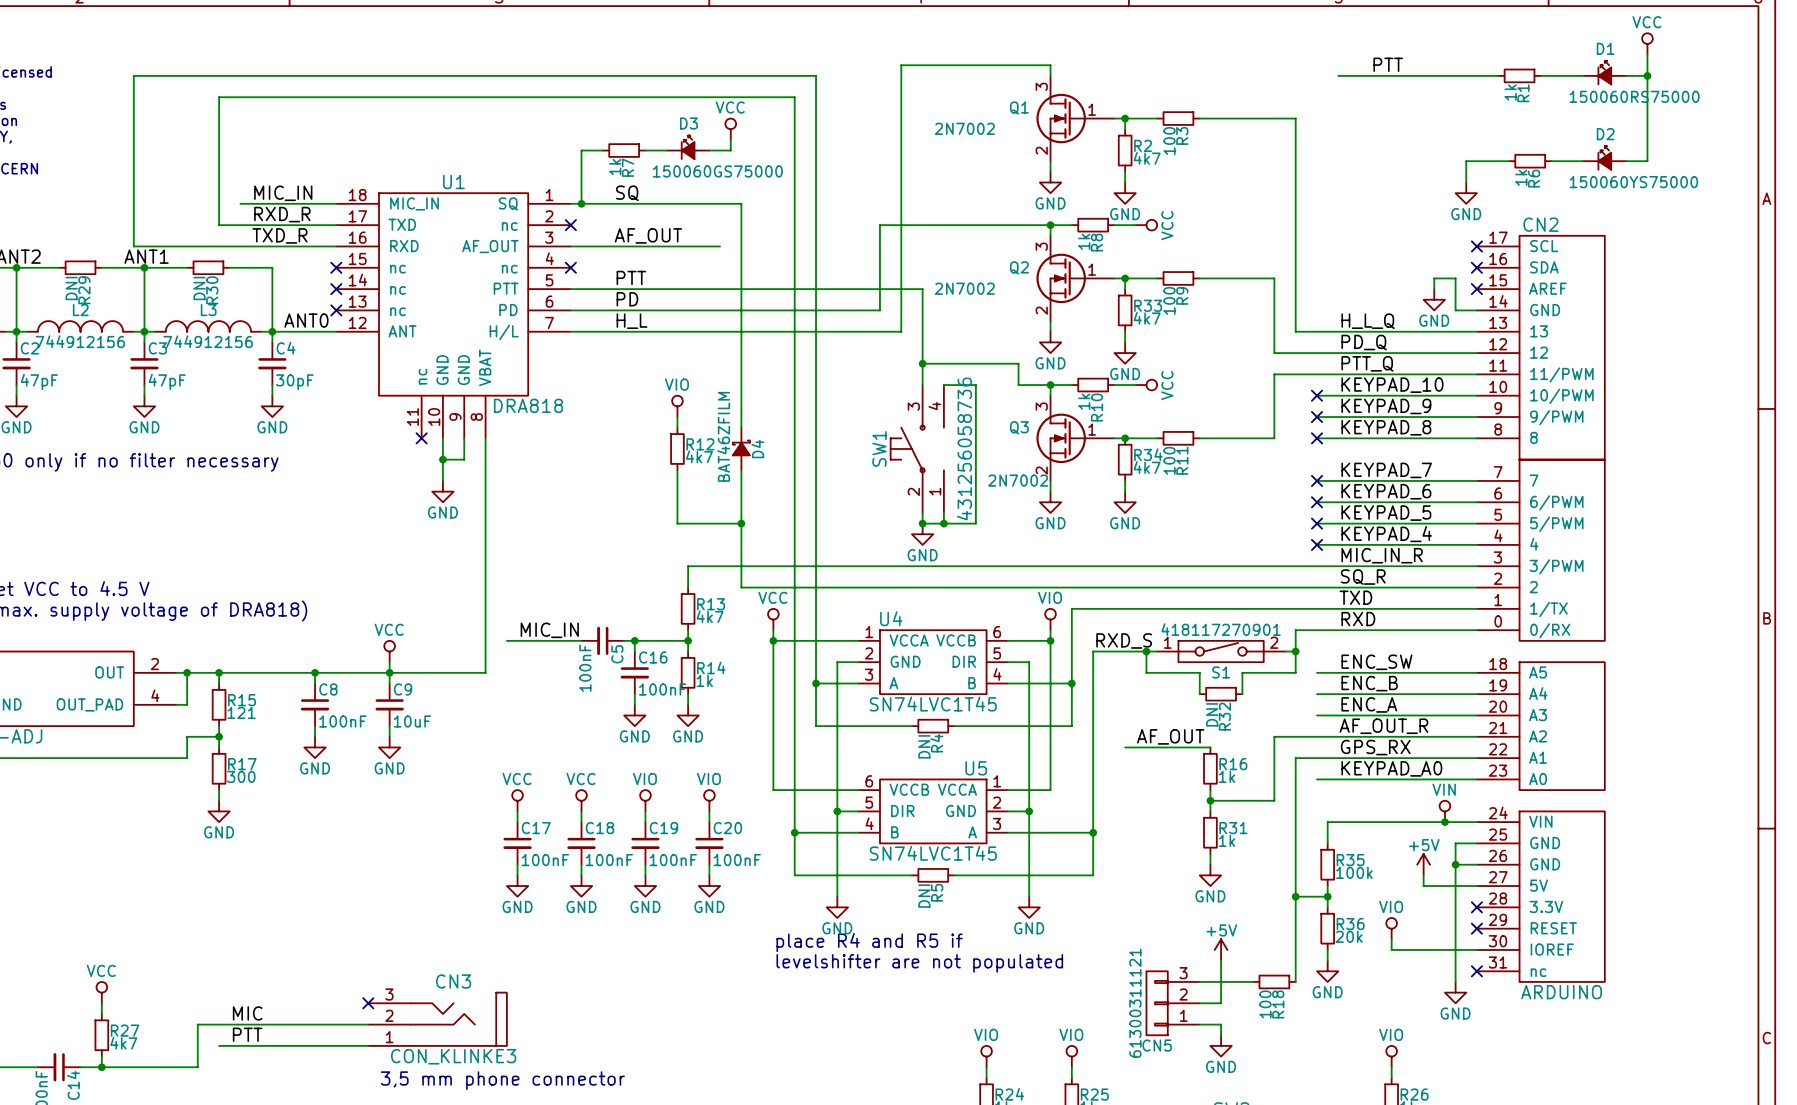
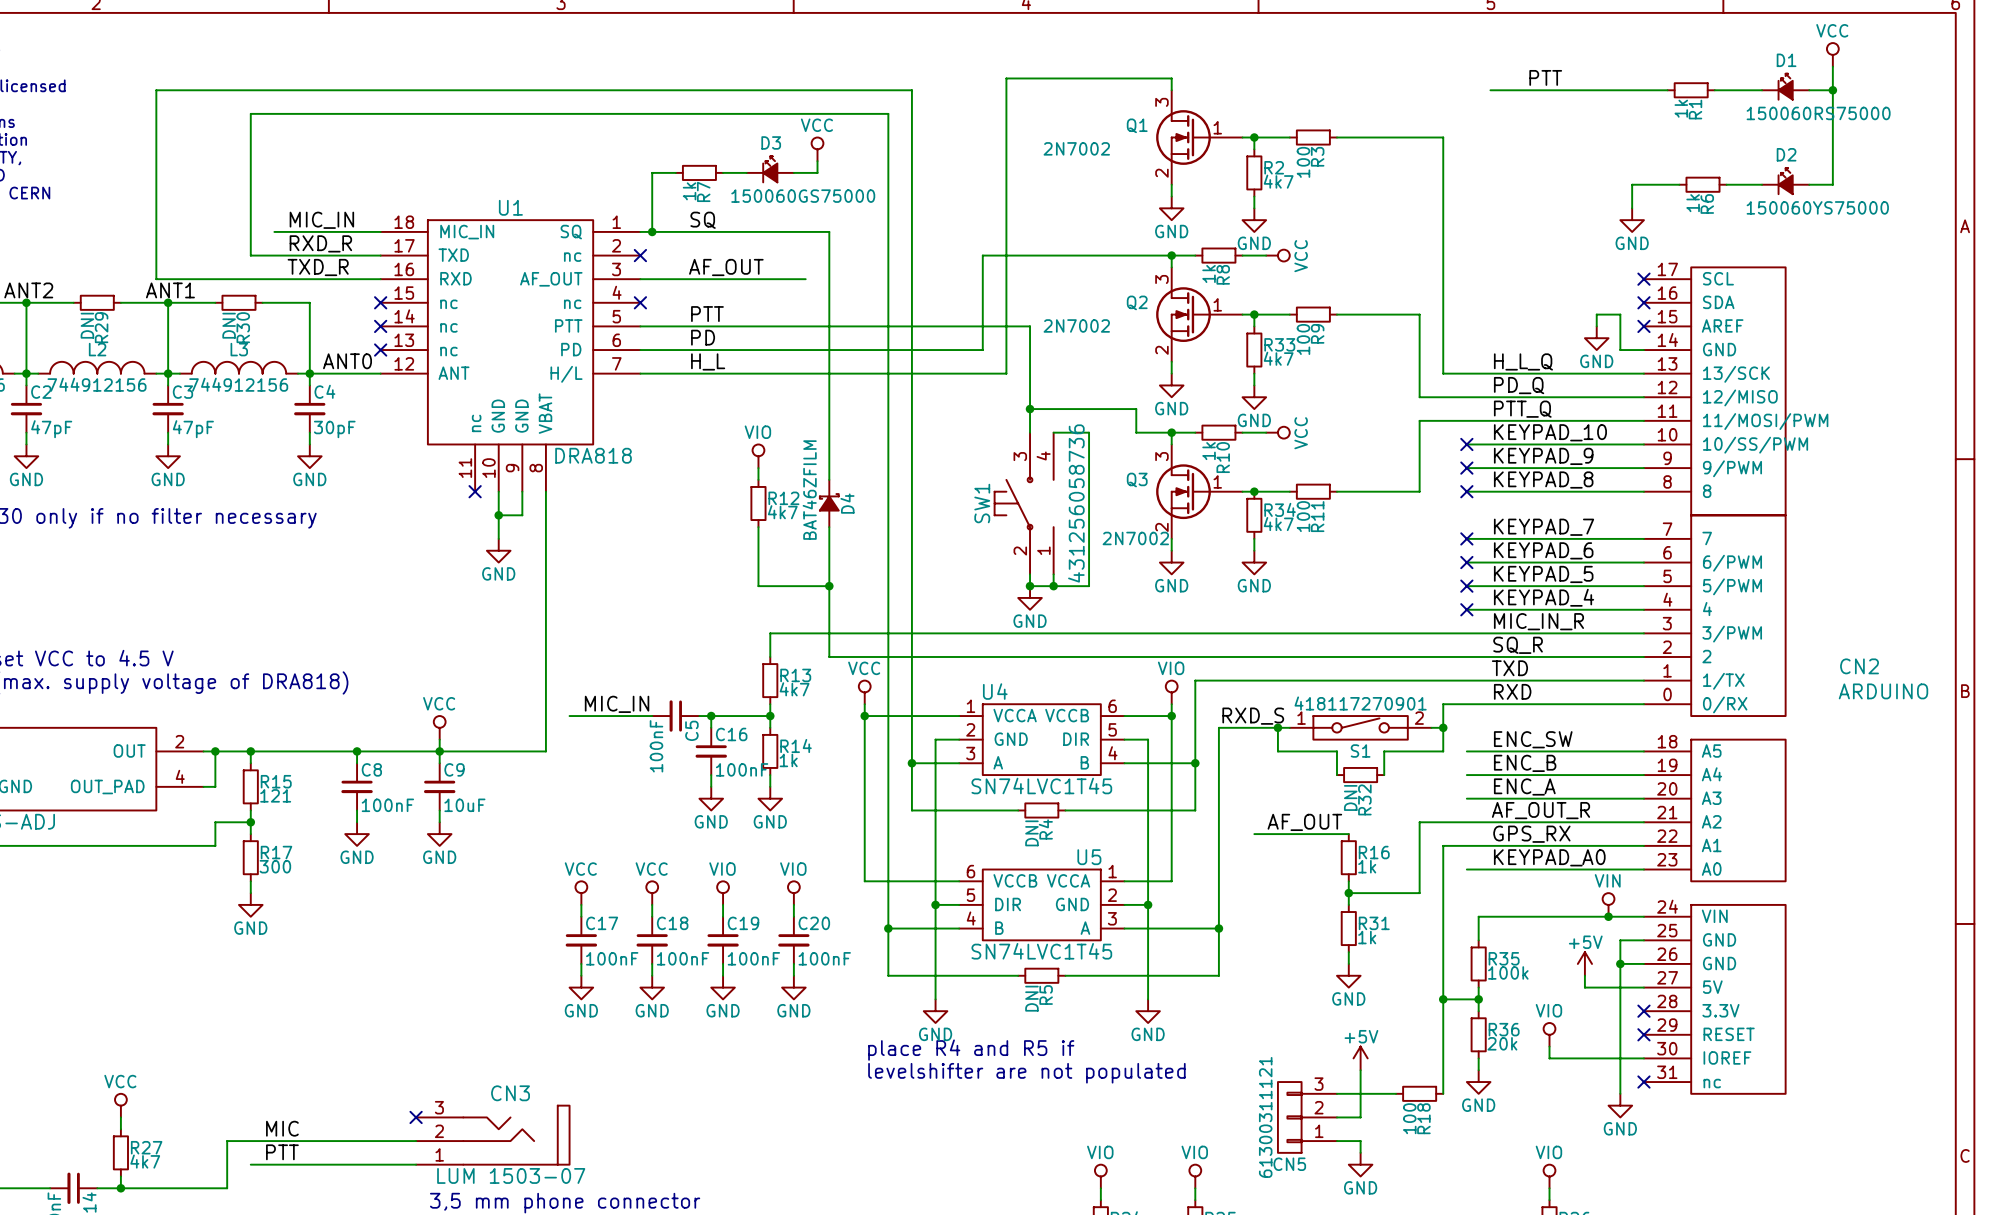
CN2 name position: CN2 (1540, 224) -> CN2 (1859, 666)
CN2 pin name: 13 (1539, 331) -> 13/SCK (1736, 374)
CN2 pin name: 12 (1539, 352) -> 12/MISO (1740, 397)
CN2 pin name: 11/PWM (1561, 375) -> 11/MOSI/PWM (1765, 421)
CN2 pin name: 10/PWM (1561, 396) -> 10/SS/PWM (1755, 445)
CN2 value position: ARDUINO (1561, 992) -> ARDUINO (1883, 691)
CN3 value: CON_KLINKE3 (453, 1056) -> LUM 1503-07 (511, 1175)

